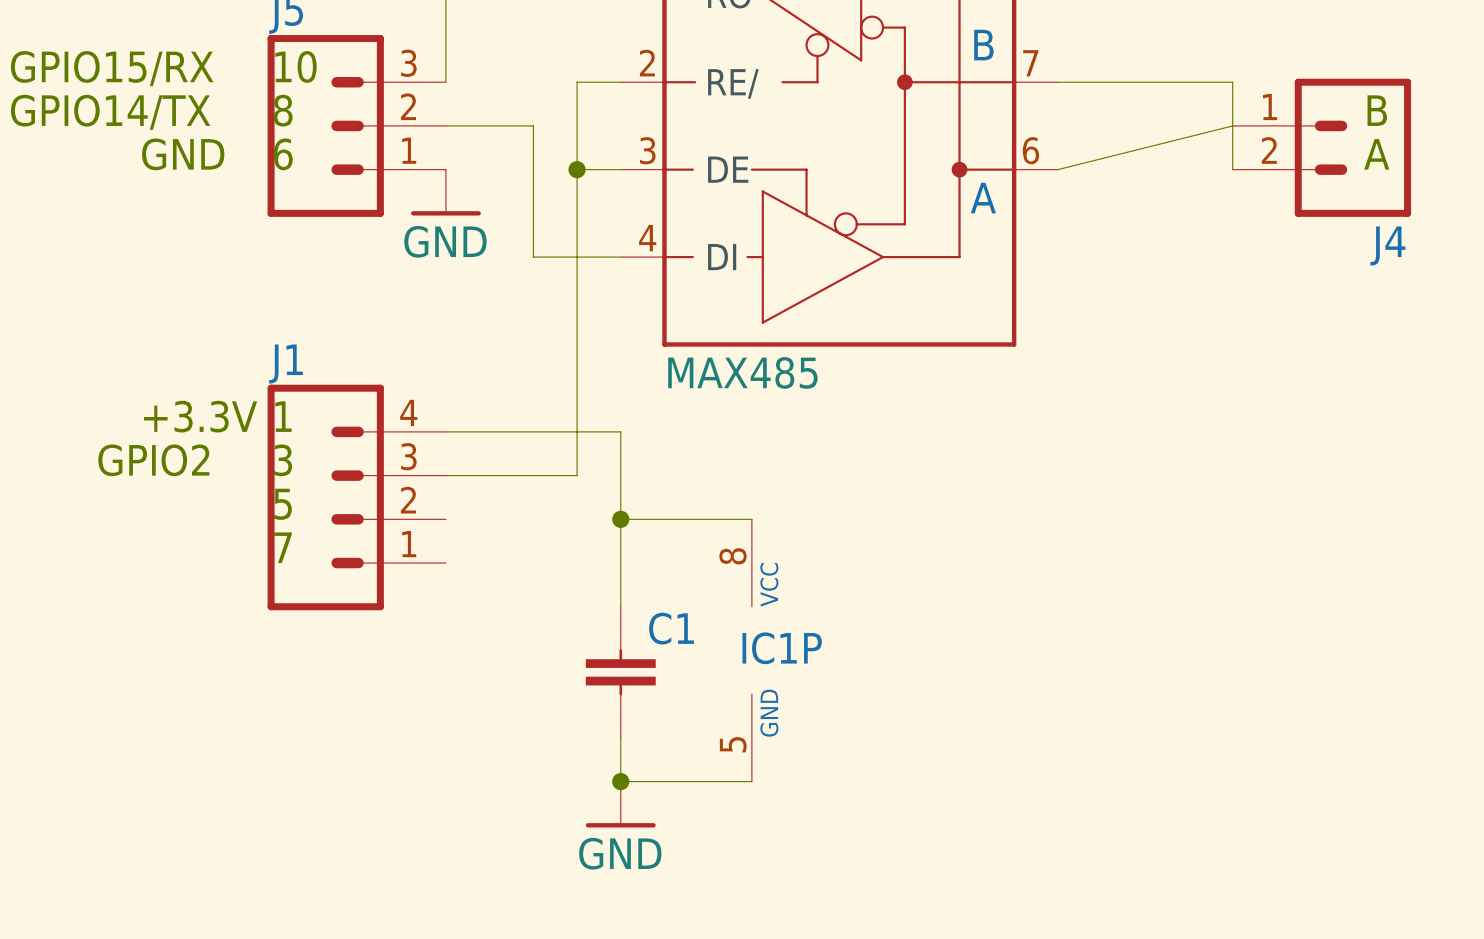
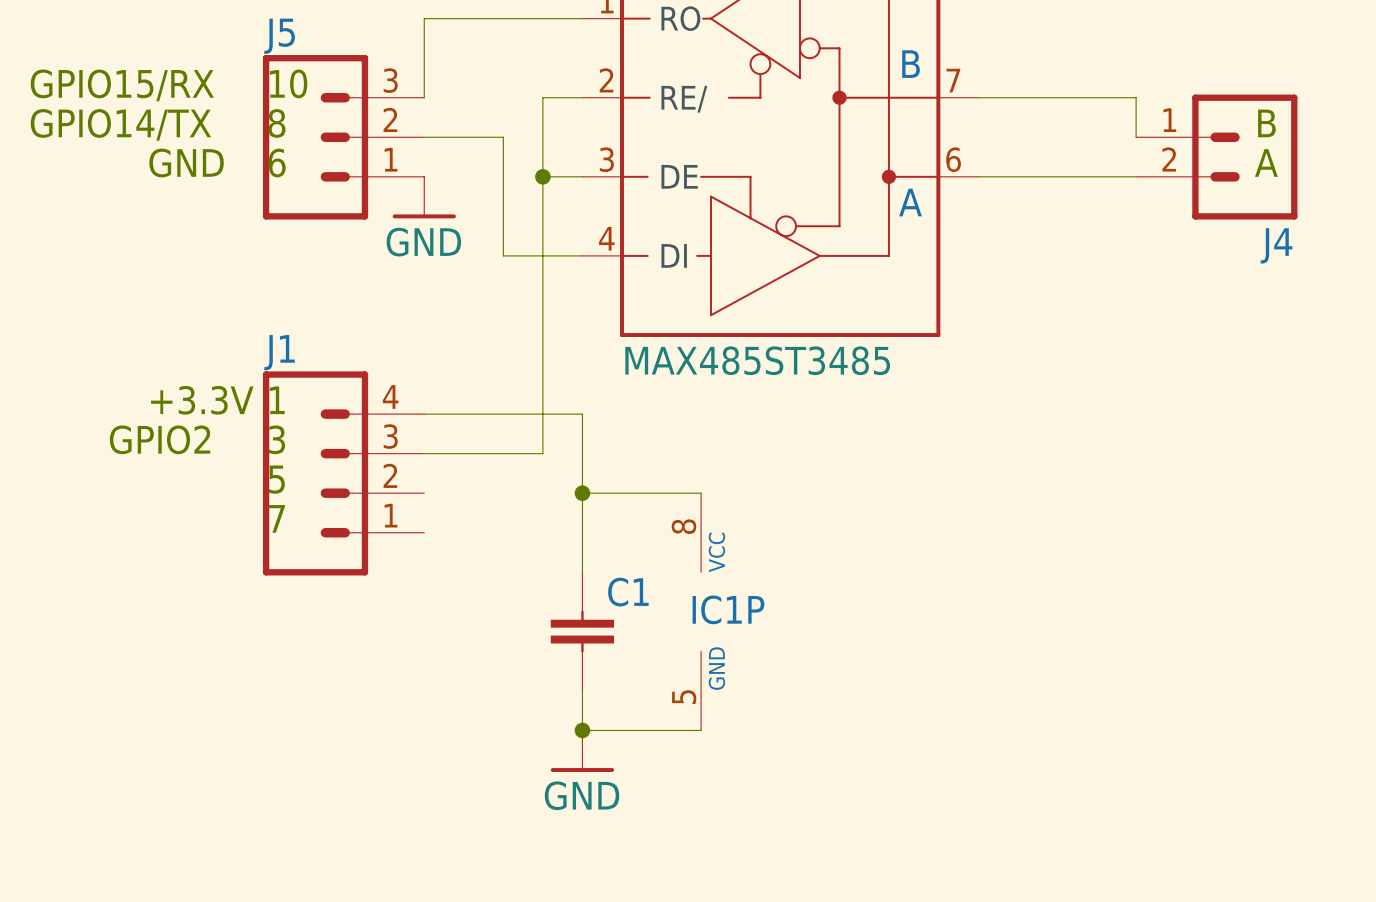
wire: (1057, 169) (1232, 125) (1232, 169) -> (977, 176) (1136, 176)
part value: MAX485 (742, 372) -> MAX485ST3485 (757, 360)

